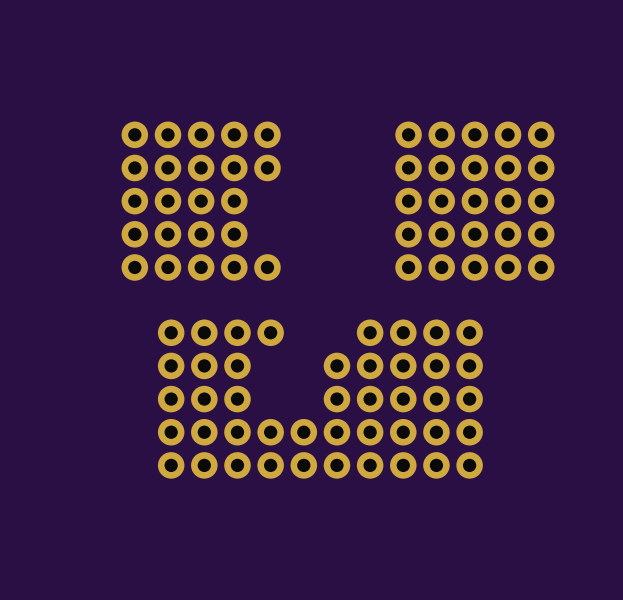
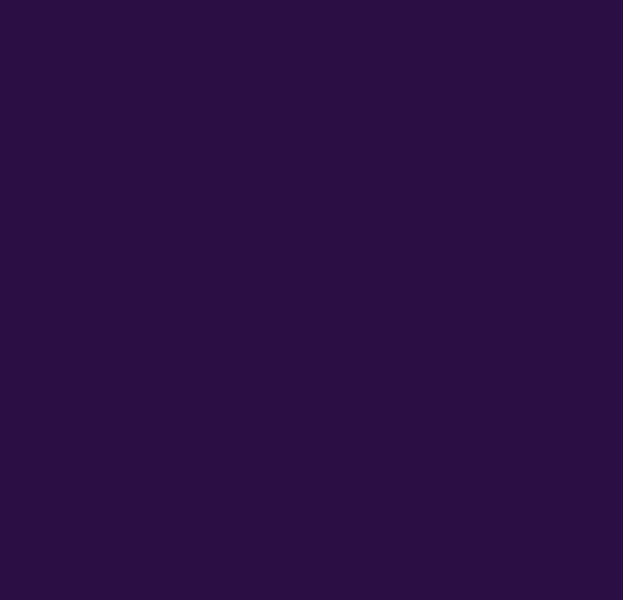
via: (134, 134) -> none
via: (167, 134) -> none
via: (201, 134) -> none
via: (234, 134) -> none
via: (267, 134) -> none
via: (408, 134) -> none
via: (441, 134) -> none
via: (474, 134) -> none
via: (508, 134) -> none
via: (541, 134) -> none
via: (134, 167) -> none
via: (167, 167) -> none
via: (201, 167) -> none
via: (234, 167) -> none
via: (267, 167) -> none
via: (408, 167) -> none
via: (441, 167) -> none
via: (474, 167) -> none
via: (508, 167) -> none
via: (541, 167) -> none
via: (134, 201) -> none
via: (167, 201) -> none
via: (201, 201) -> none
via: (234, 201) -> none
via: (408, 201) -> none
via: (441, 201) -> none
via: (474, 201) -> none
via: (508, 201) -> none
via: (541, 201) -> none
via: (134, 234) -> none
via: (167, 234) -> none
via: (201, 234) -> none
via: (234, 234) -> none
via: (408, 234) -> none
via: (441, 234) -> none
via: (474, 234) -> none
via: (508, 234) -> none
via: (541, 234) -> none
via: (134, 267) -> none
via: (167, 267) -> none
via: (201, 267) -> none
via: (234, 267) -> none
via: (267, 267) -> none
via: (408, 267) -> none
via: (441, 267) -> none
via: (474, 267) -> none
via: (508, 267) -> none
via: (541, 267) -> none
via: (171, 332) -> none
via: (204, 332) -> none
via: (237, 332) -> none
via: (270, 332) -> none
via: (370, 332) -> none
via: (403, 332) -> none
via: (436, 332) -> none
via: (469, 332) -> none
via: (171, 365) -> none
via: (204, 365) -> none
via: (237, 365) -> none
via: (336, 365) -> none
via: (370, 365) -> none
via: (403, 365) -> none
via: (436, 365) -> none
via: (469, 365) -> none
via: (171, 399) -> none
via: (204, 399) -> none
via: (237, 399) -> none
via: (336, 399) -> none
via: (370, 399) -> none
via: (403, 399) -> none
via: (436, 399) -> none
via: (469, 399) -> none
via: (171, 432) -> none
via: (204, 432) -> none
via: (237, 432) -> none
via: (270, 432) -> none
via: (303, 432) -> none
via: (336, 432) -> none
via: (370, 432) -> none
via: (403, 432) -> none
via: (436, 432) -> none
via: (469, 432) -> none
via: (171, 465) -> none
via: (204, 465) -> none
via: (237, 465) -> none
via: (270, 465) -> none
via: (303, 465) -> none
via: (336, 465) -> none
via: (370, 465) -> none
via: (403, 465) -> none
via: (436, 465) -> none
via: (469, 465) -> none

